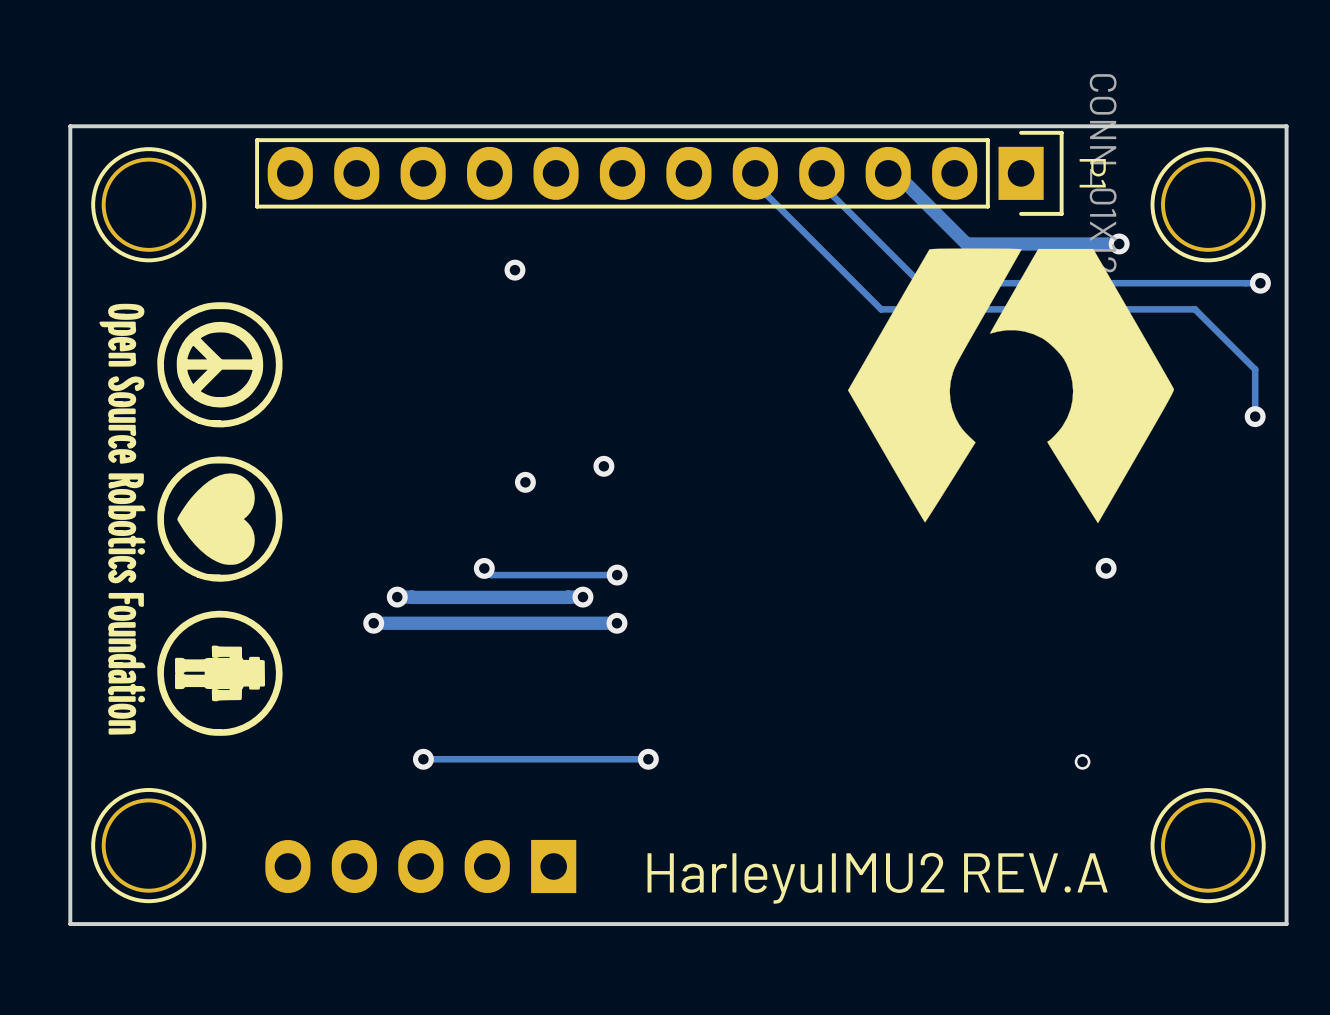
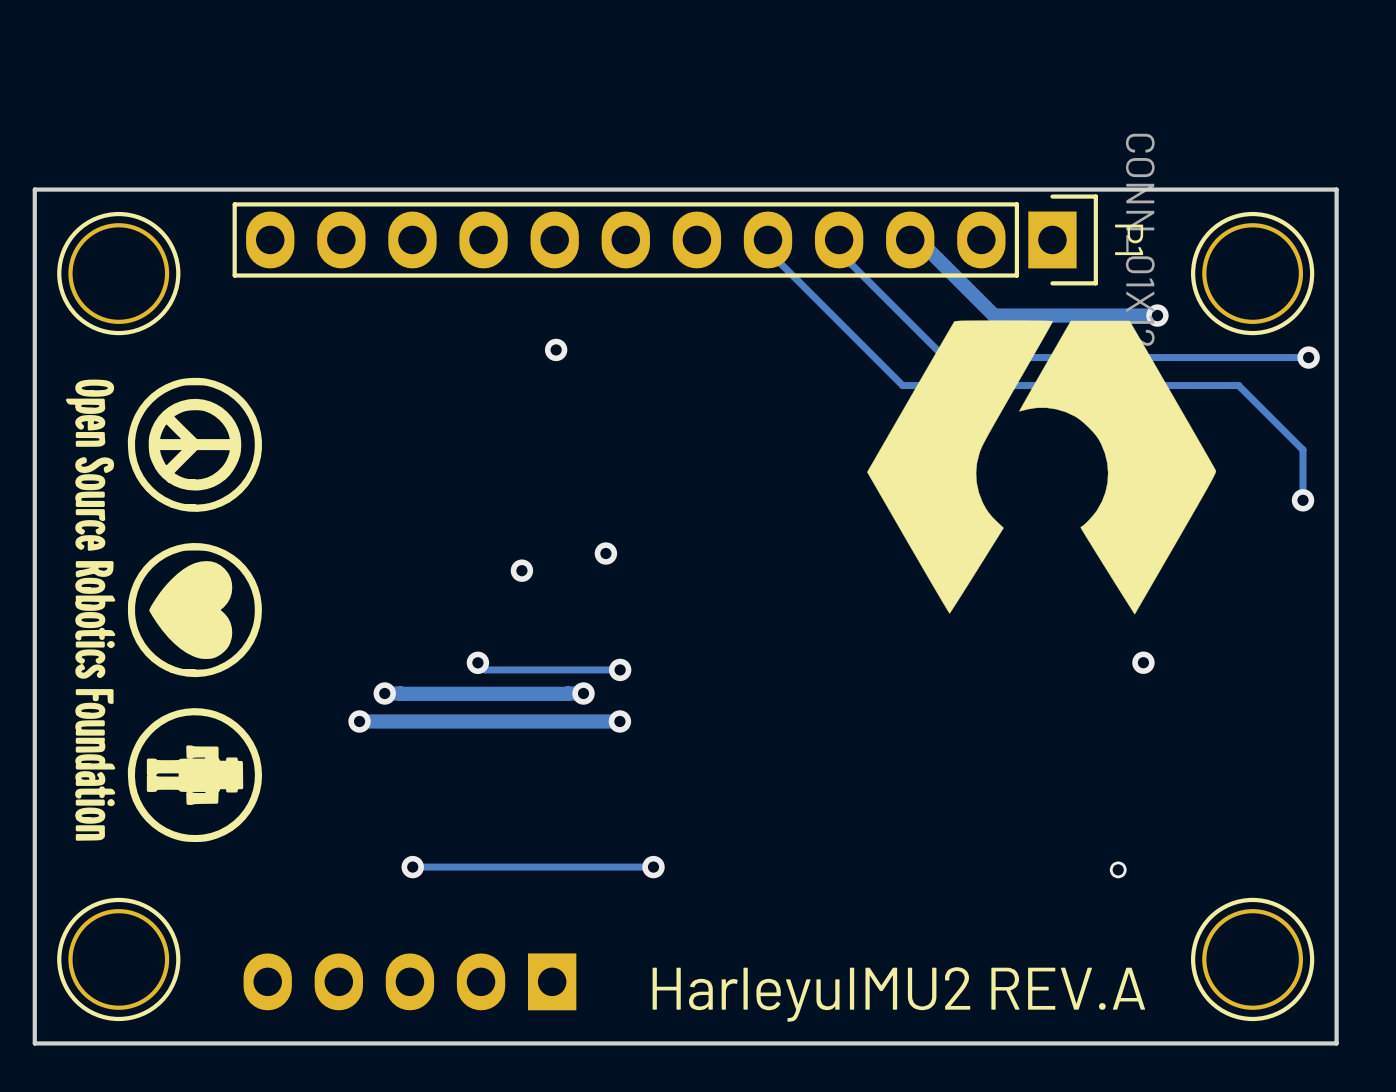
via position: (514, 270) -> (556, 349)

